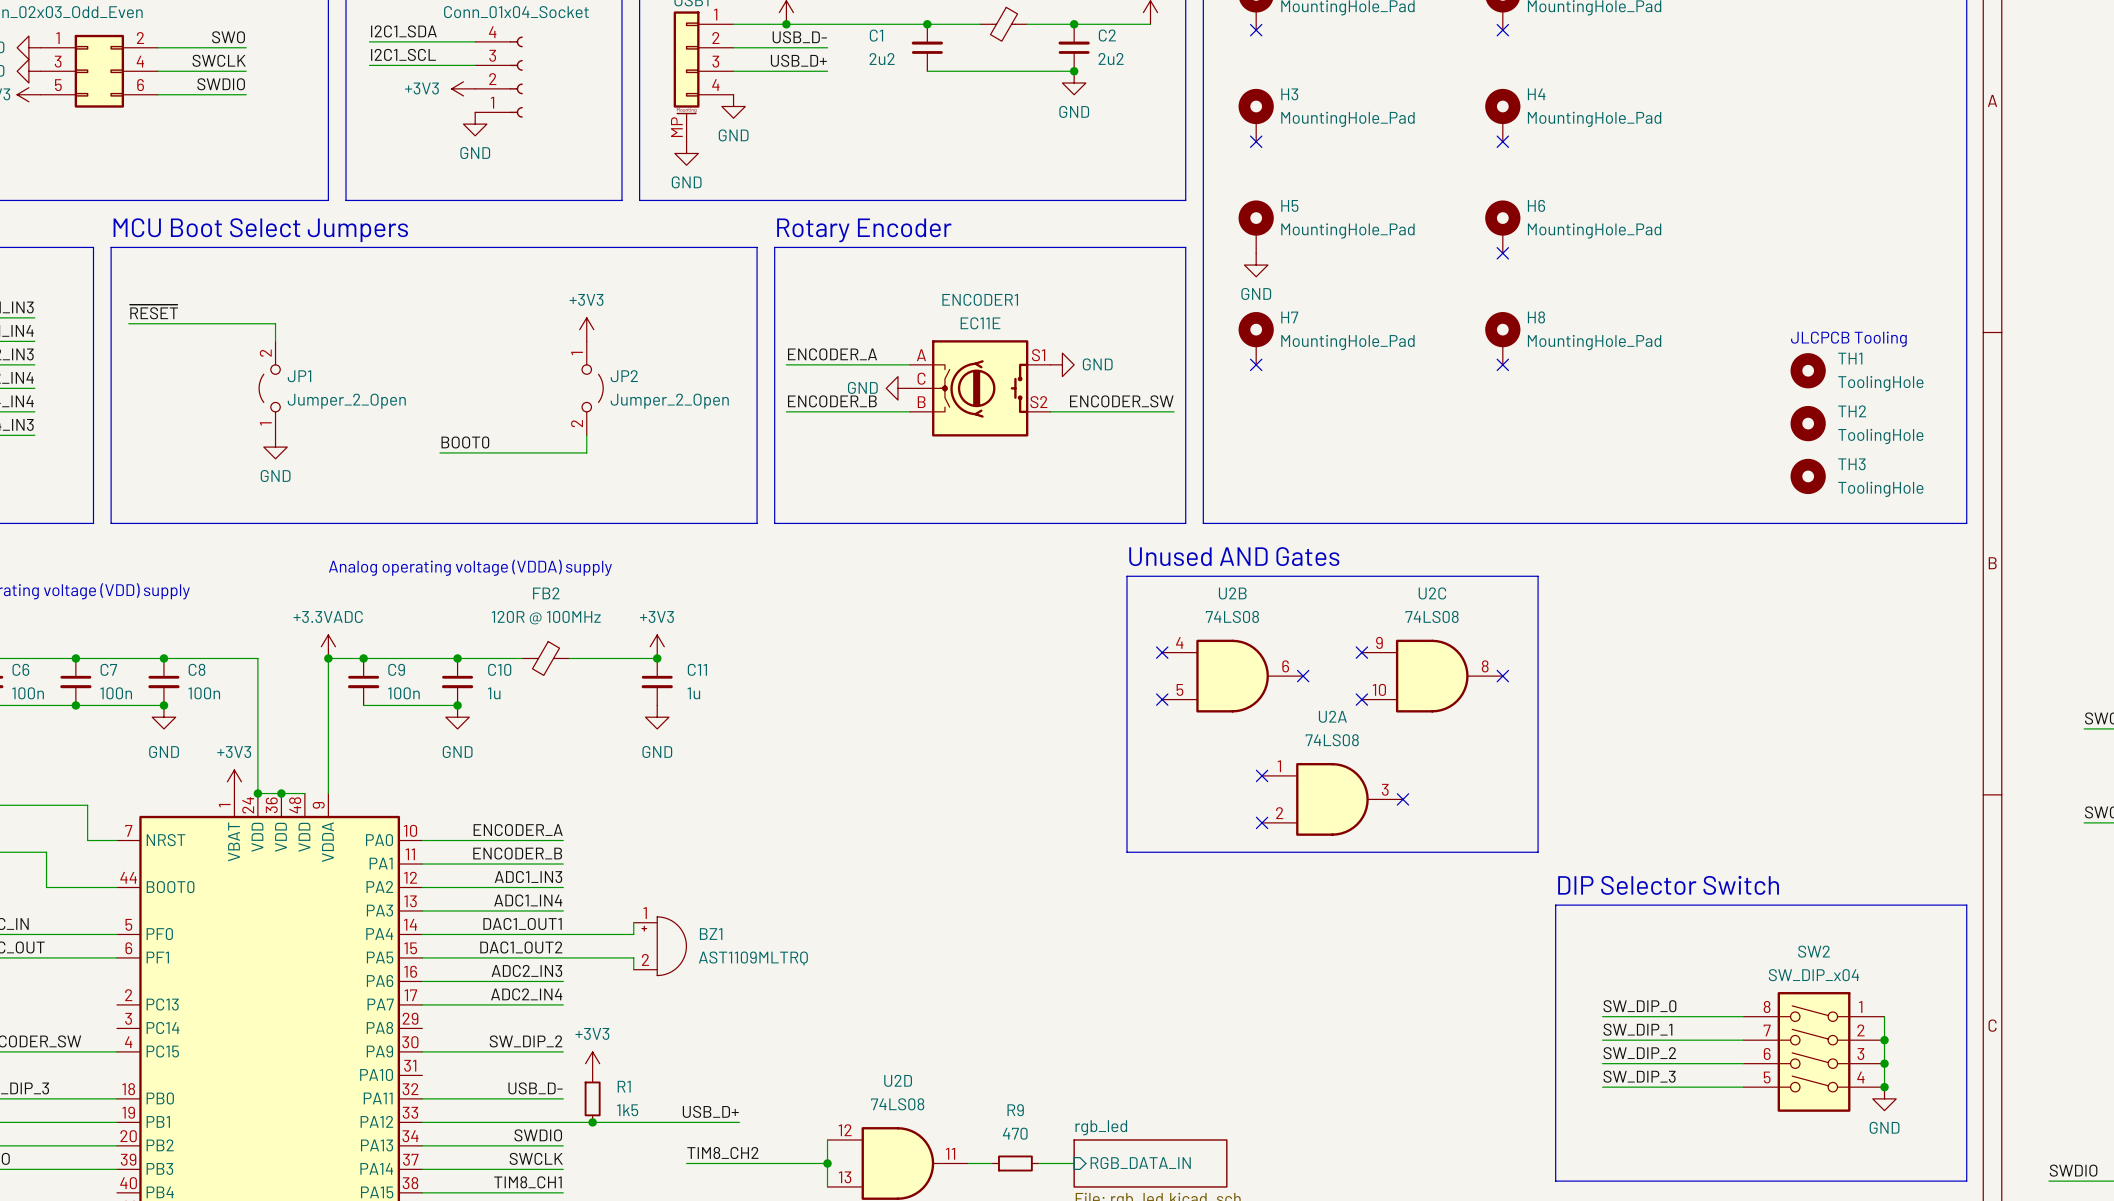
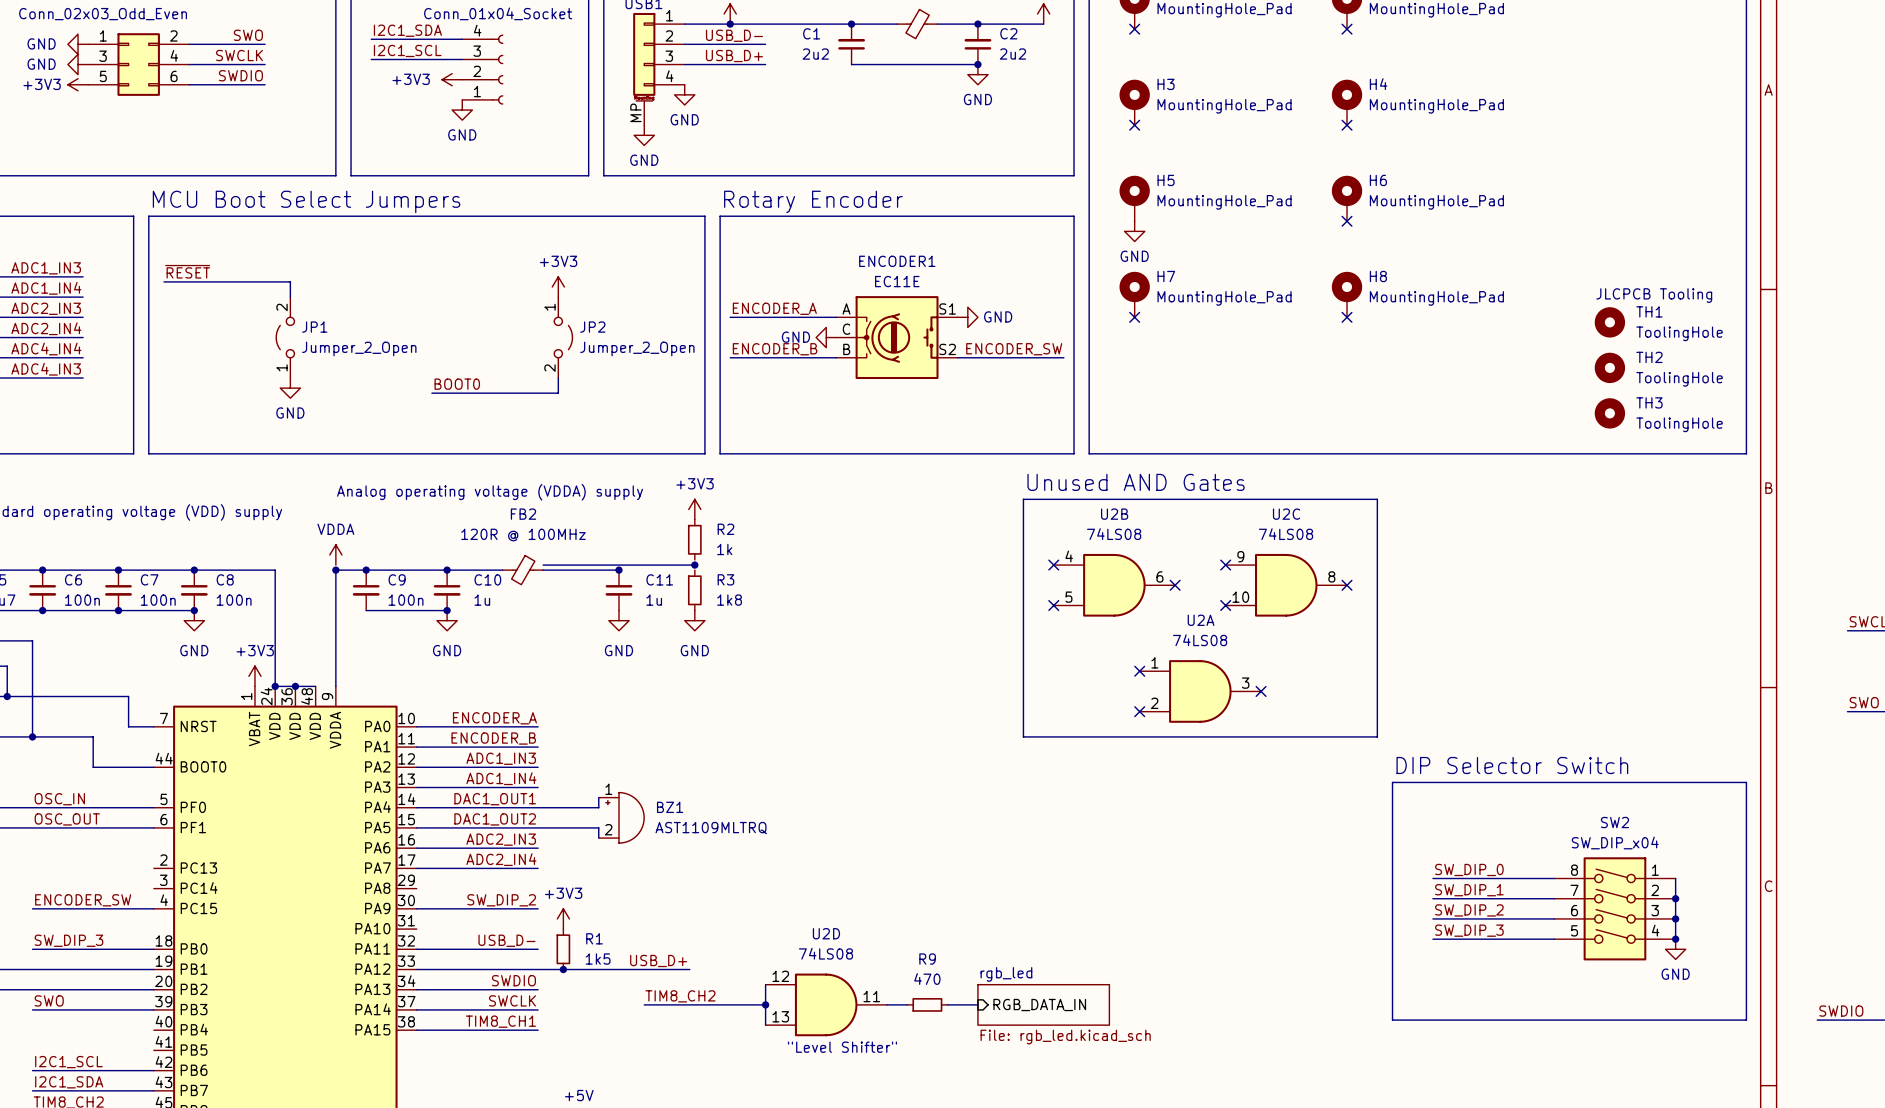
R2: none -> 1k (694, 539)
power symbol: +3.3VADC (328, 646) -> VDDA (335, 554)
power symbol position: +3V3 (657, 646) -> +3V3 (694, 509)
wire: none -> (543, 565) (694, 565)
junction: none -> (694, 565)
R3: none -> 1k8 (694, 590)
power symbol: none -> GND (694, 620)

